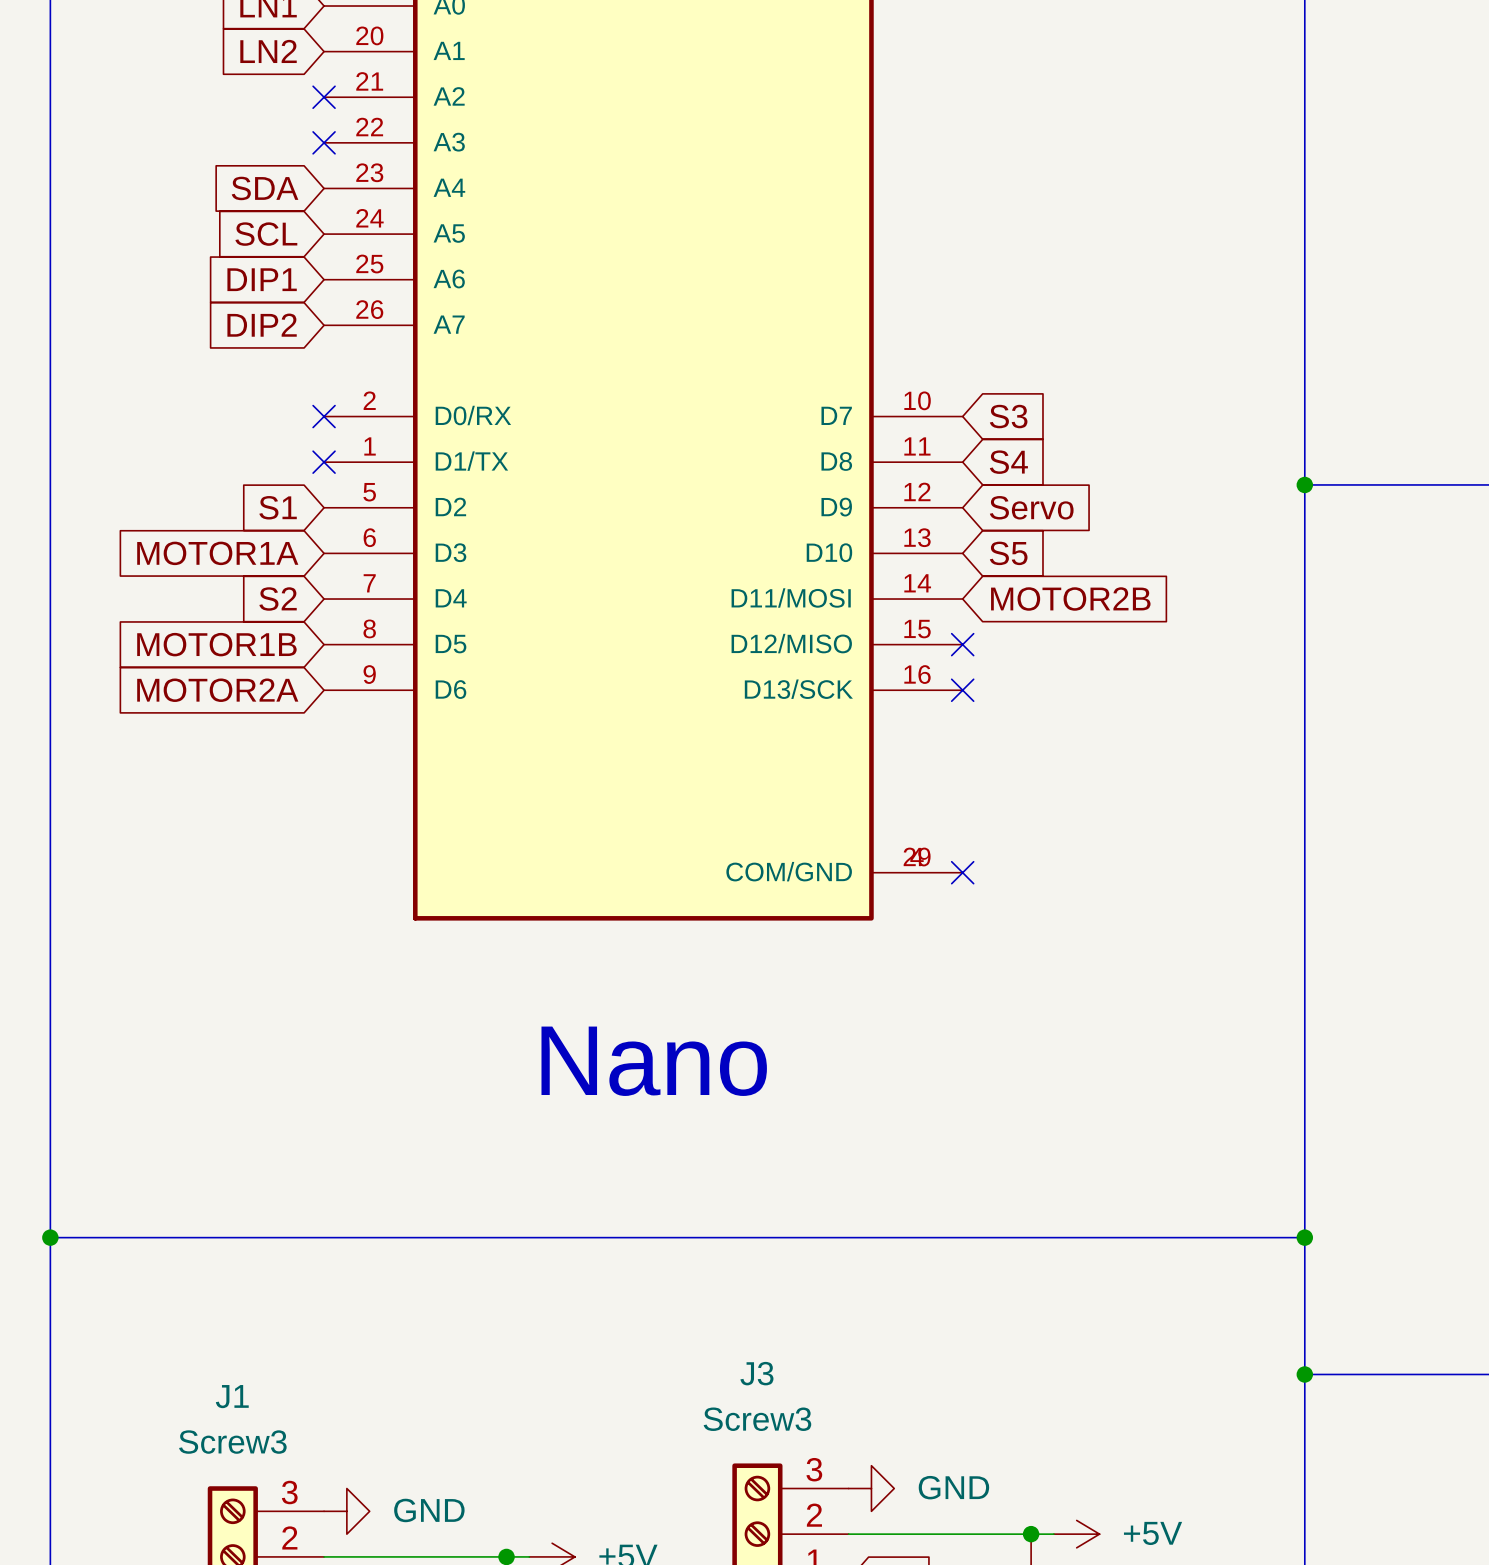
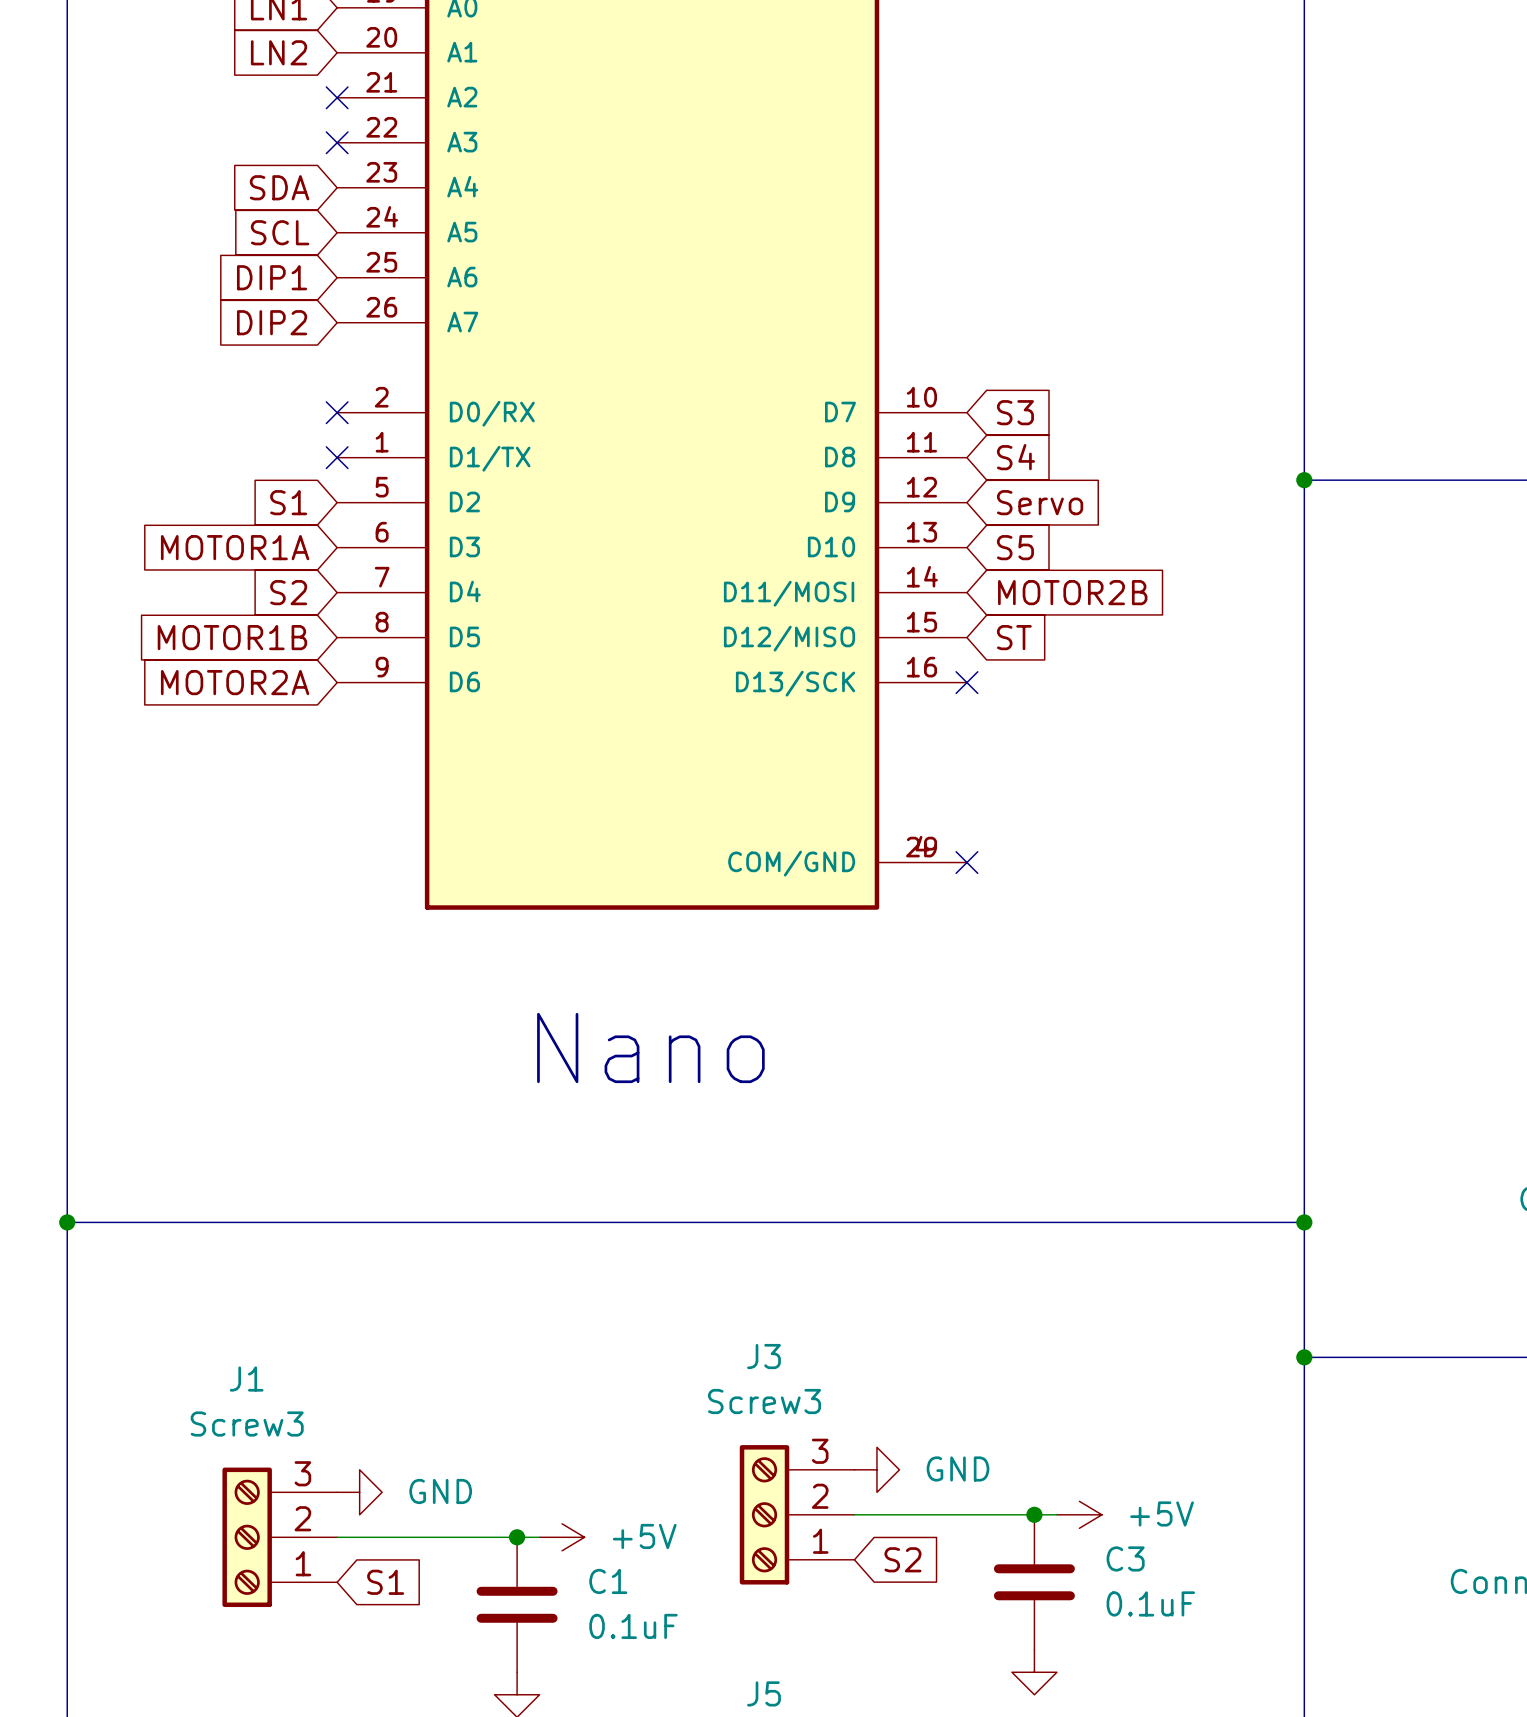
no-connect mark: (962, 644) -> none
global label: none -> ST (1014, 637)

